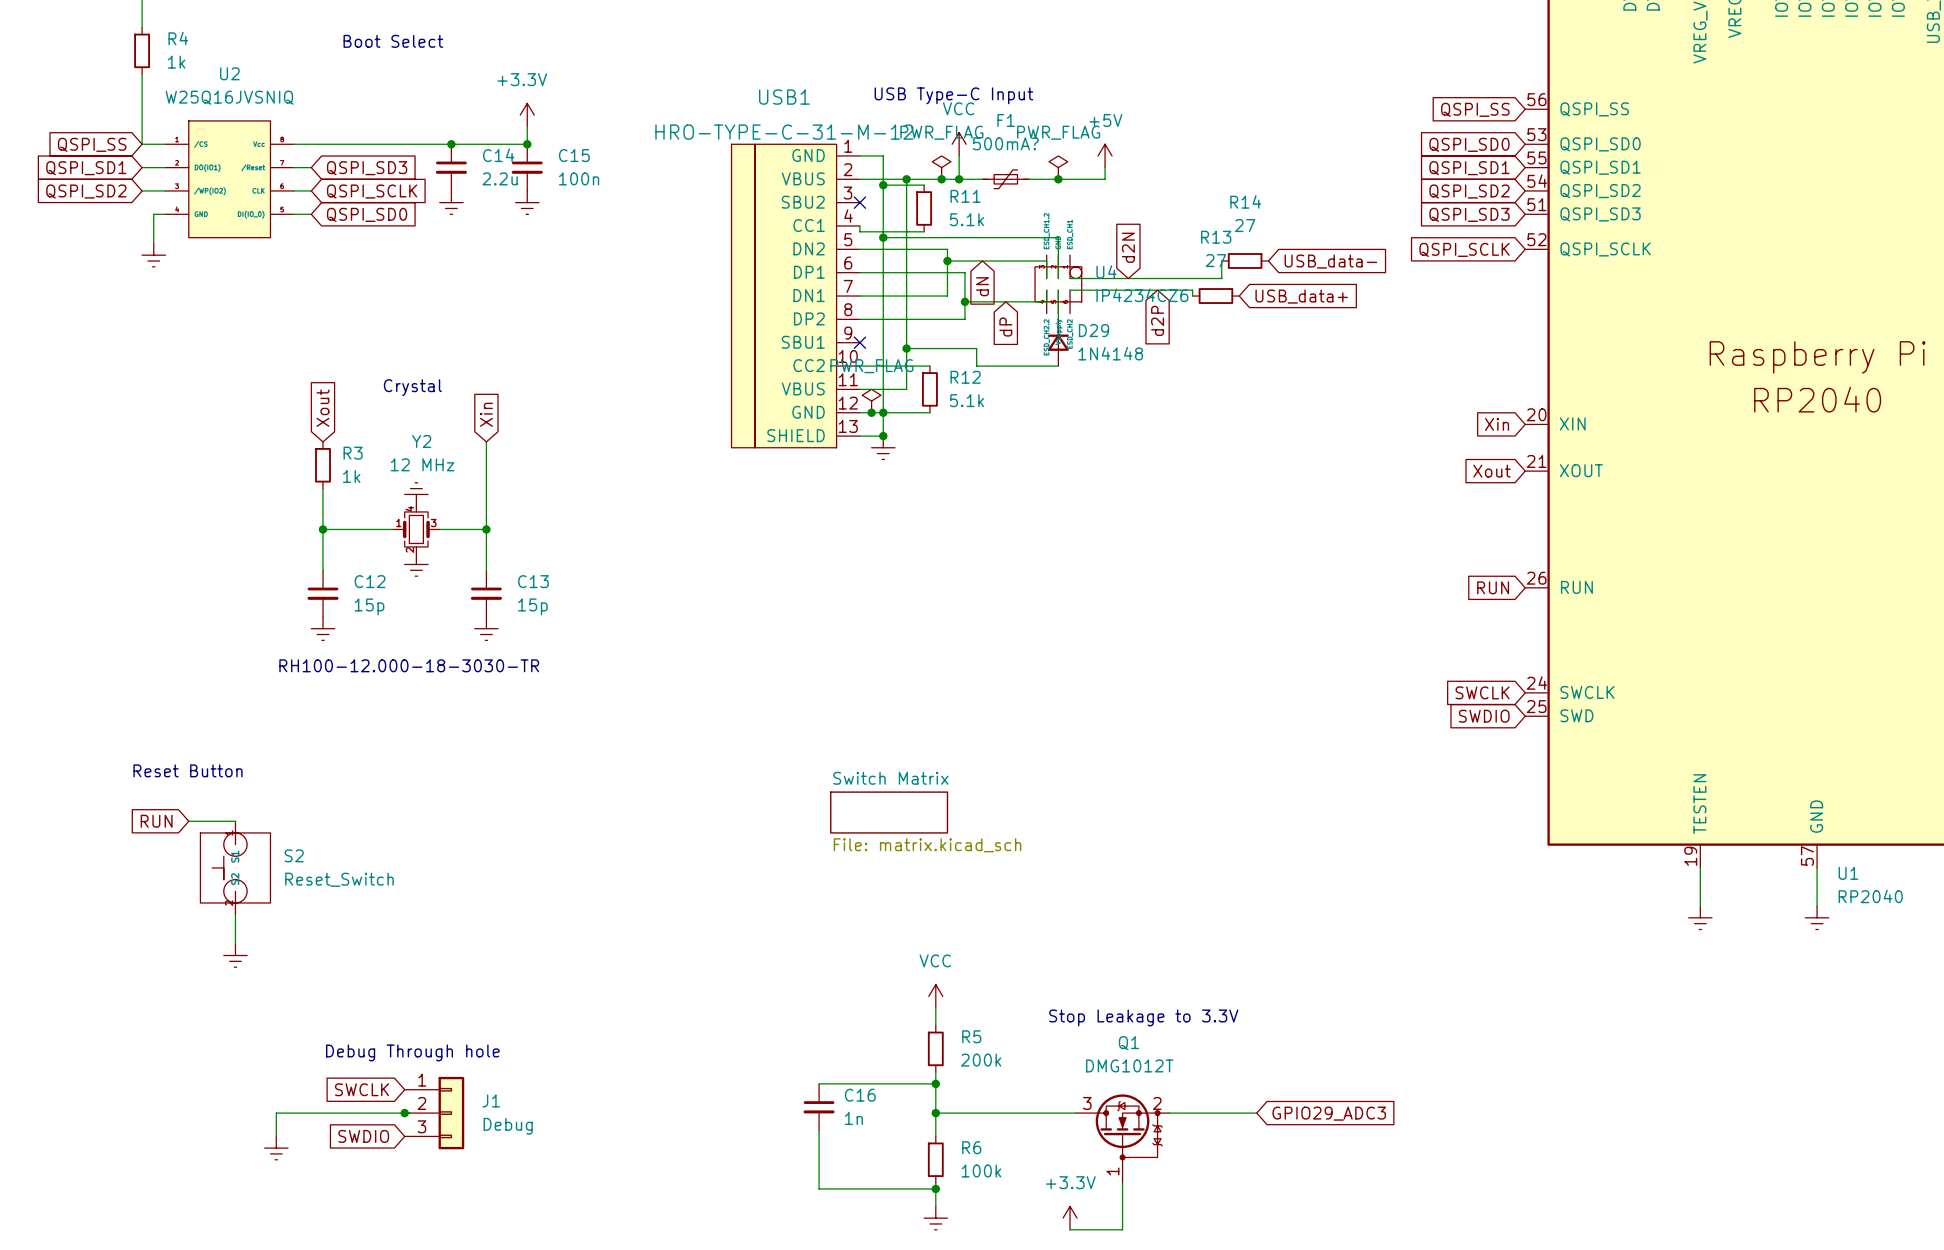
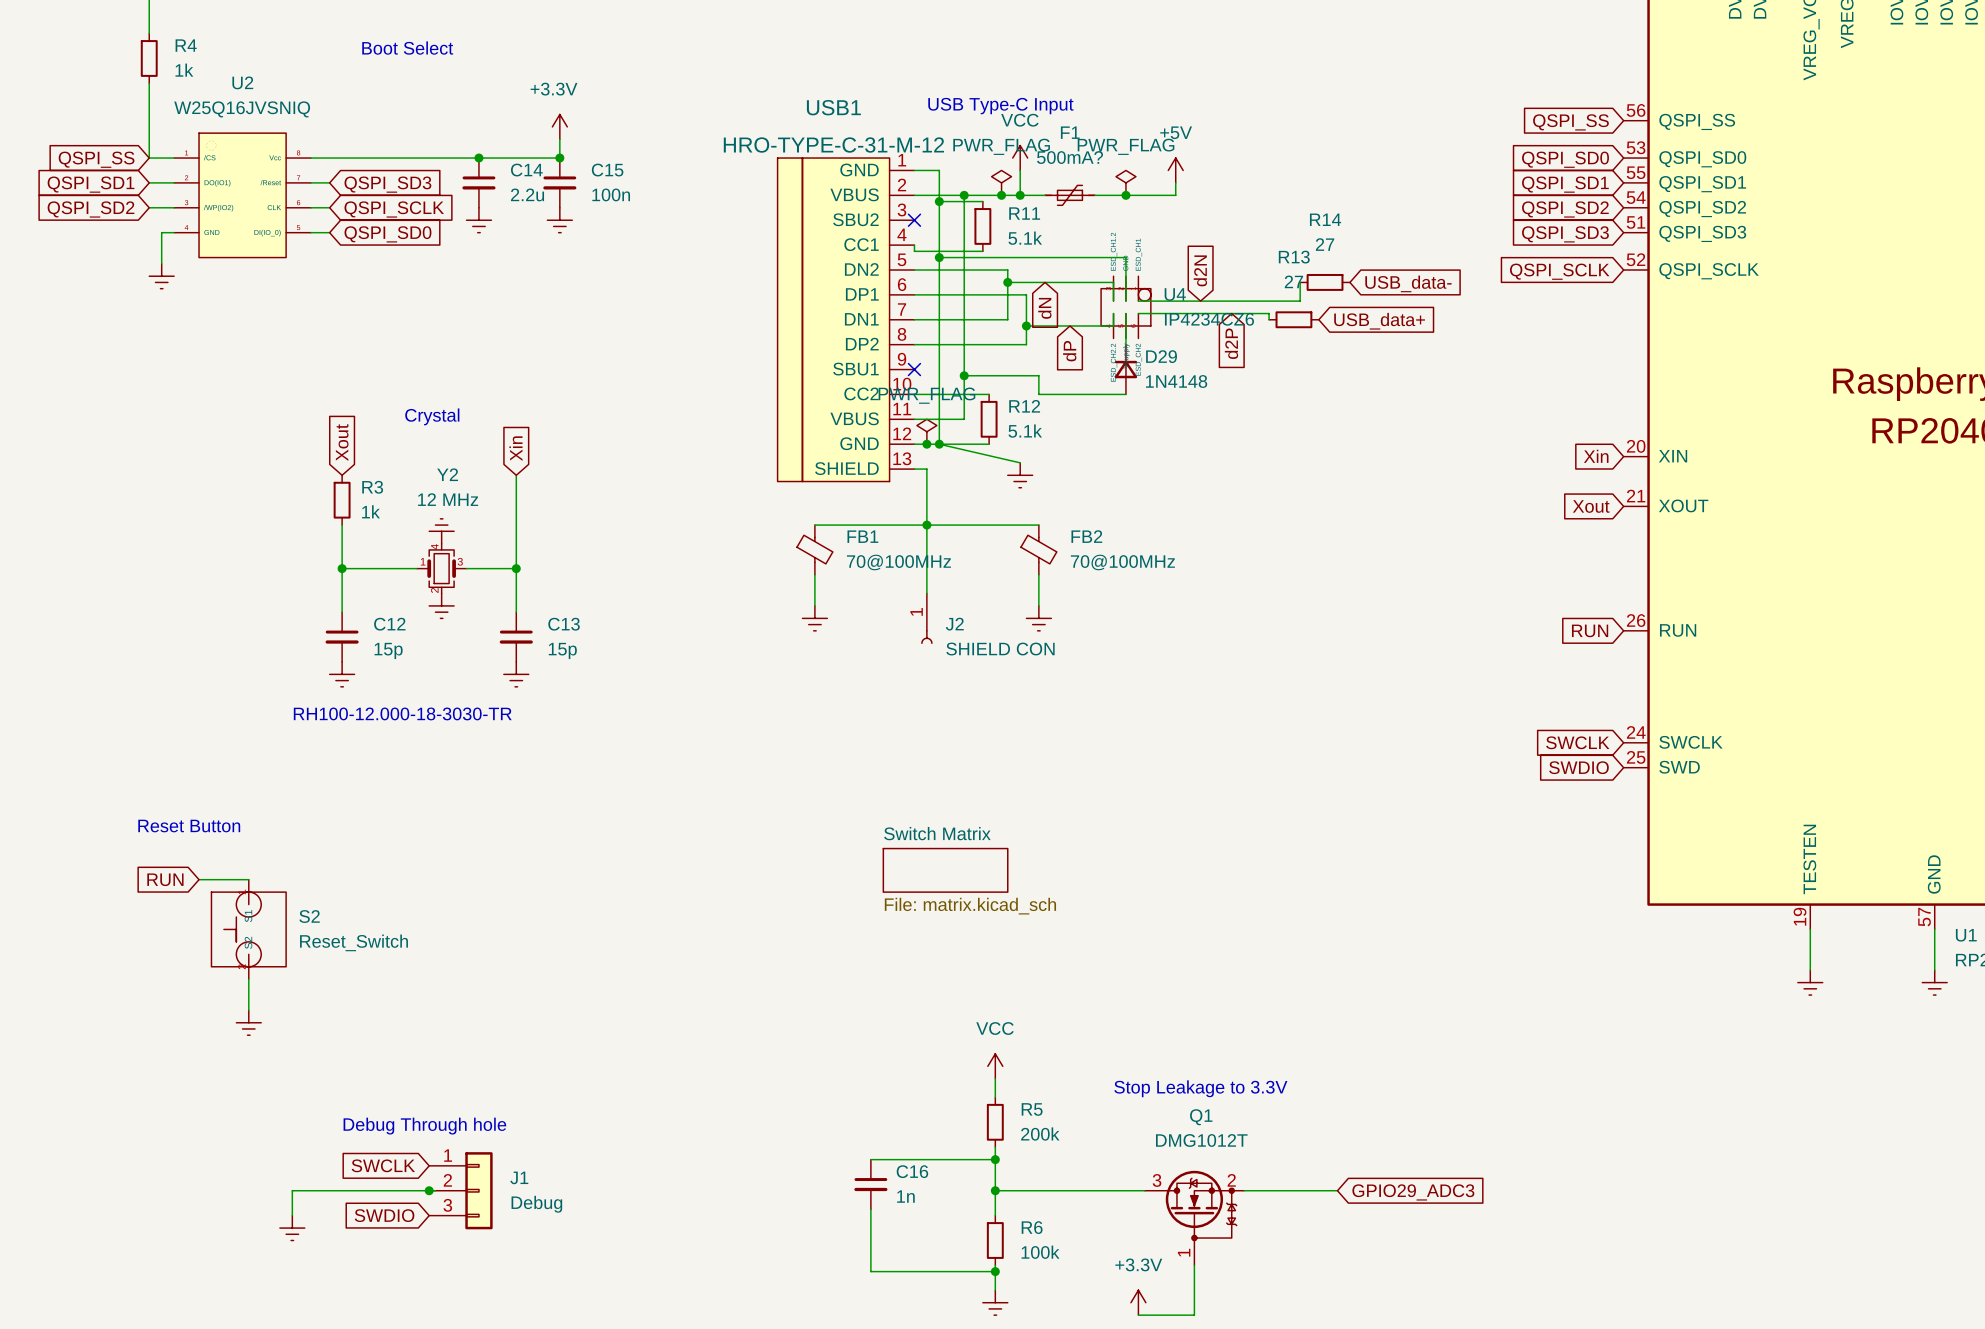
wire: (883, 412) (883, 436) (871, 436) -> (939, 444) (1020, 462)
wire: none -> (926, 469) (926, 593)
junction position: (883, 436) -> (926, 525)
power symbol position: (883, 447) -> (1020, 475)
wire: none -> (814, 525) (1038, 525)
FB1: none -> 70@100MHz (814, 549)
FB2: none -> 70@100MHz (1038, 549)
wire: none -> (814, 574) (814, 605)
wire: none -> (1038, 574) (1038, 605)
power symbol: none -> (814, 618)
J2: none -> SHIELD CON (926, 618)
power symbol: none -> (1038, 618)

